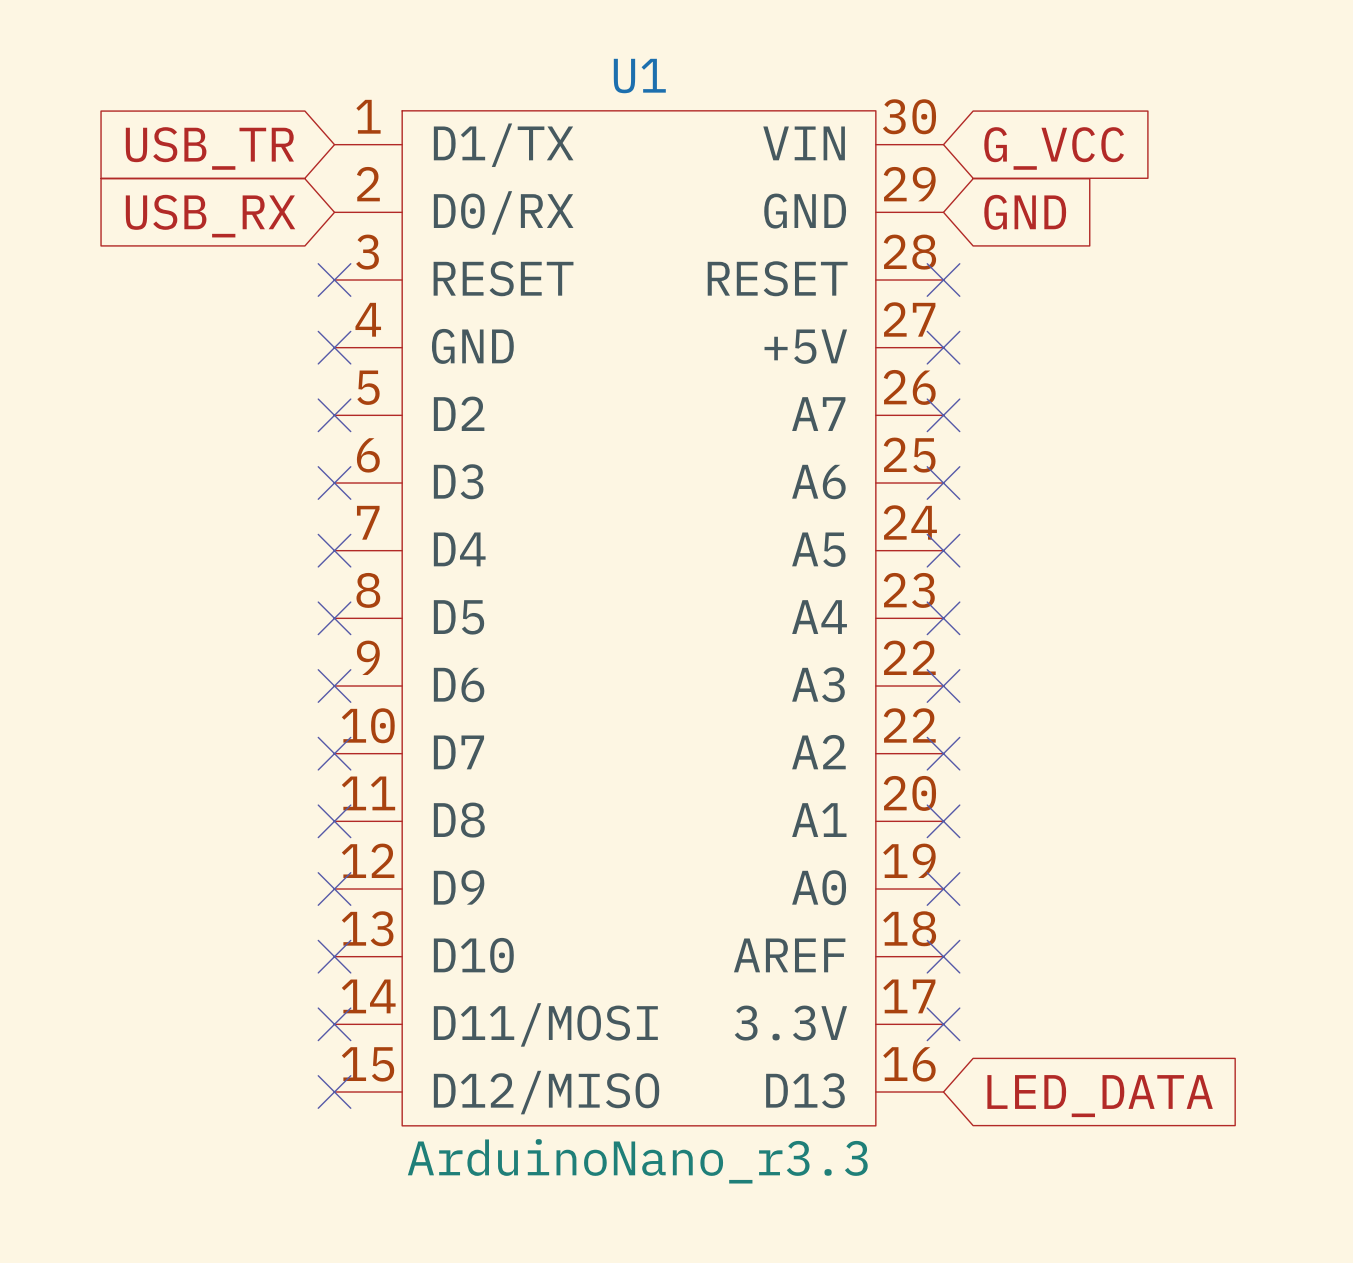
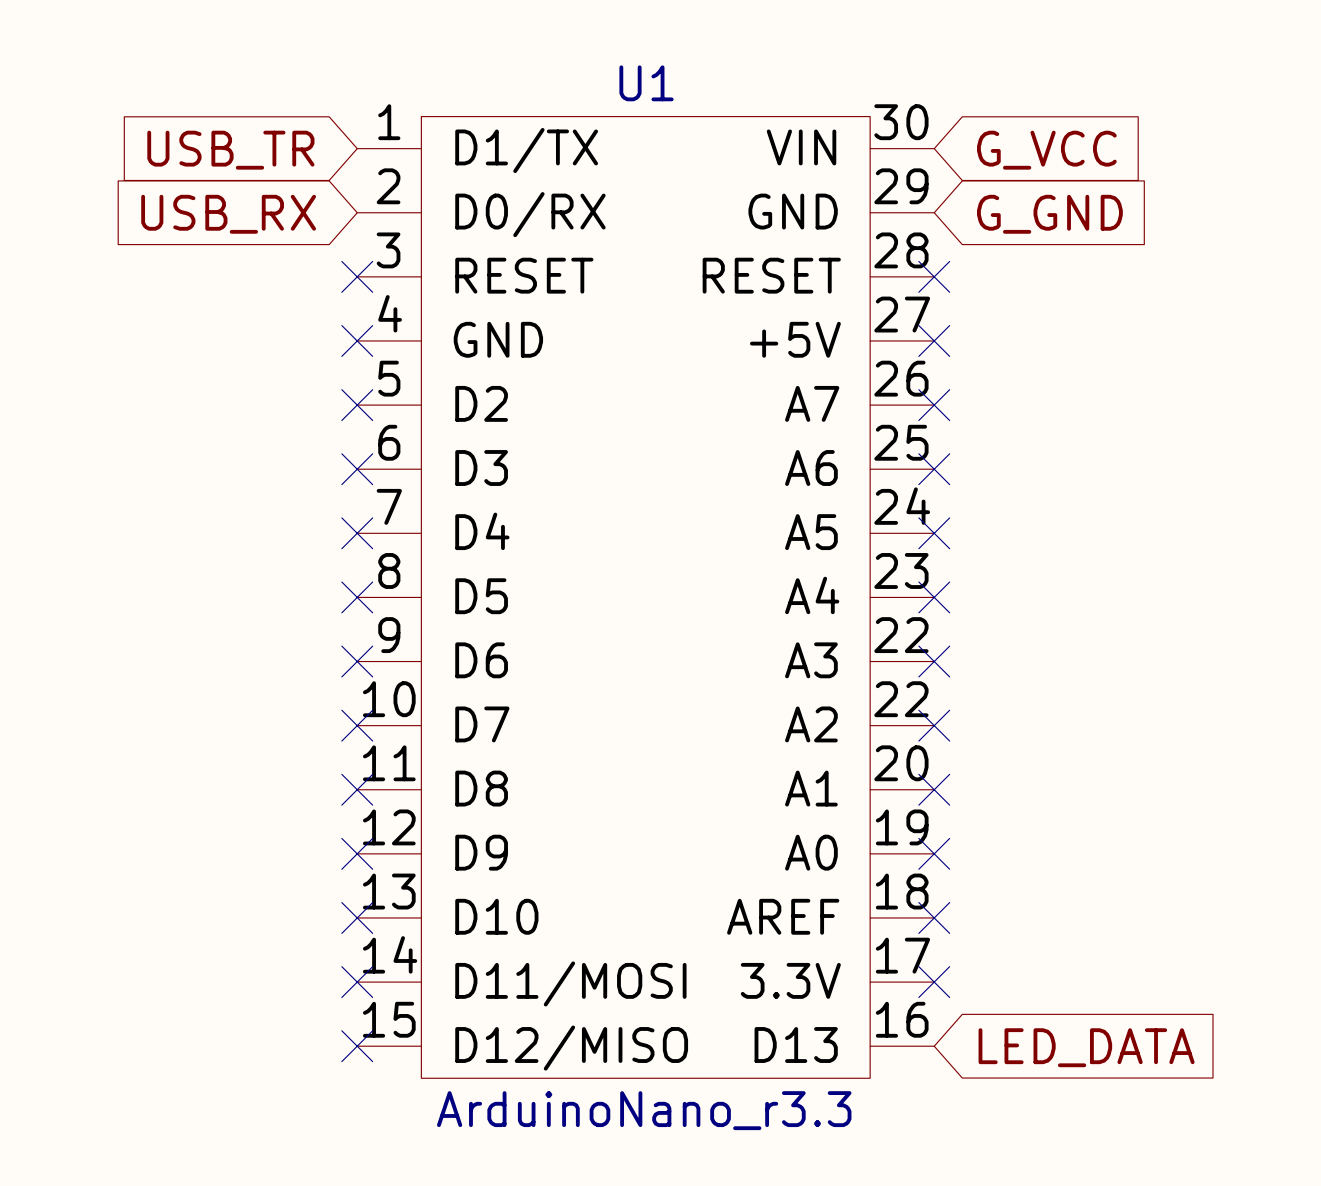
global label: GND (1025, 212) -> G_GND (1049, 214)

